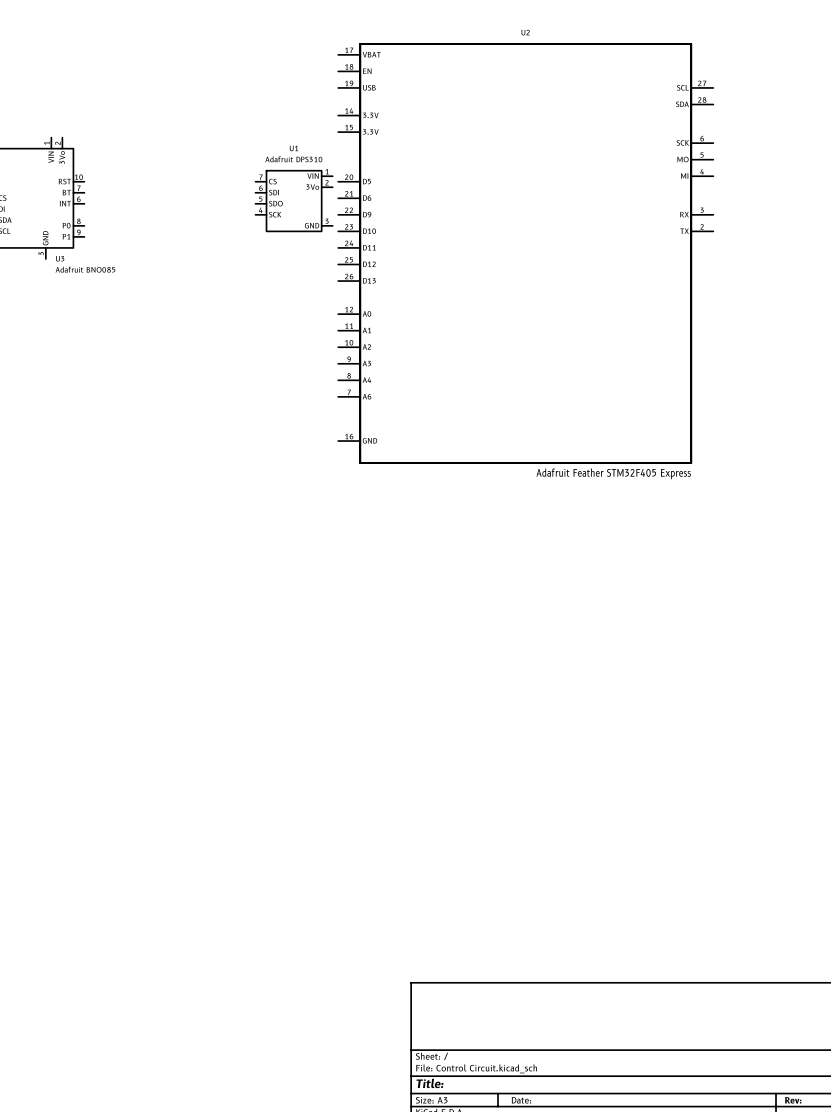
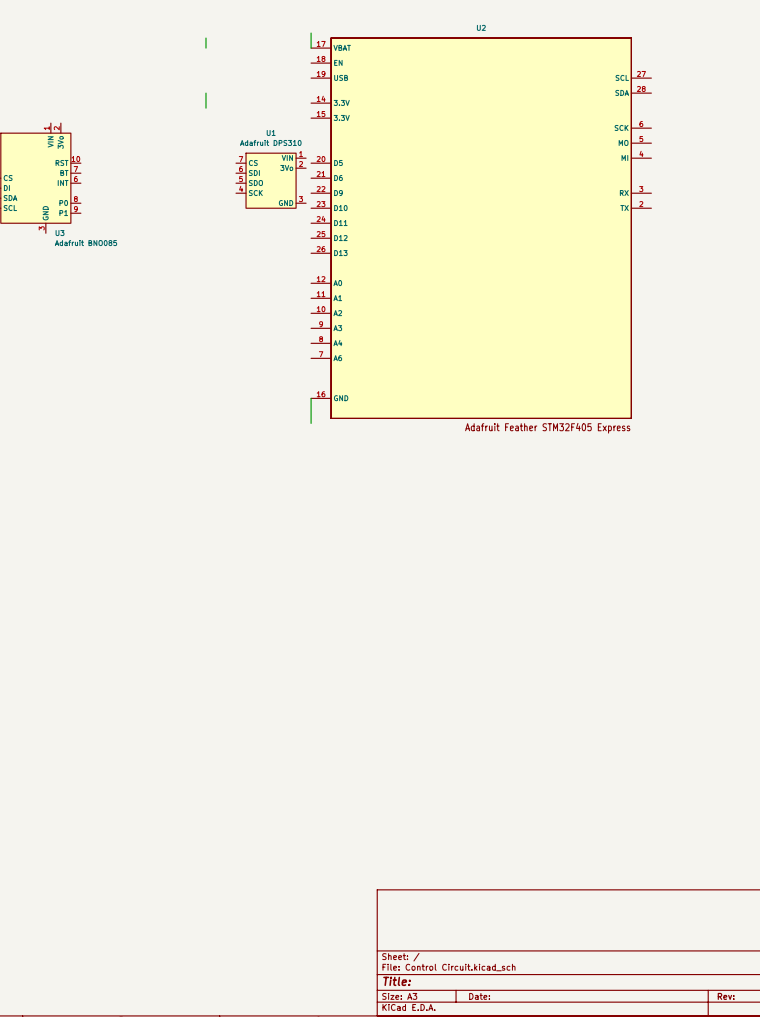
wire: none -> (311, 33) (311, 48)
wire: none -> (205, 38) (205, 48)
wire: none -> (205, 93) (205, 108)
wire: none -> (311, 398) (311, 423)

